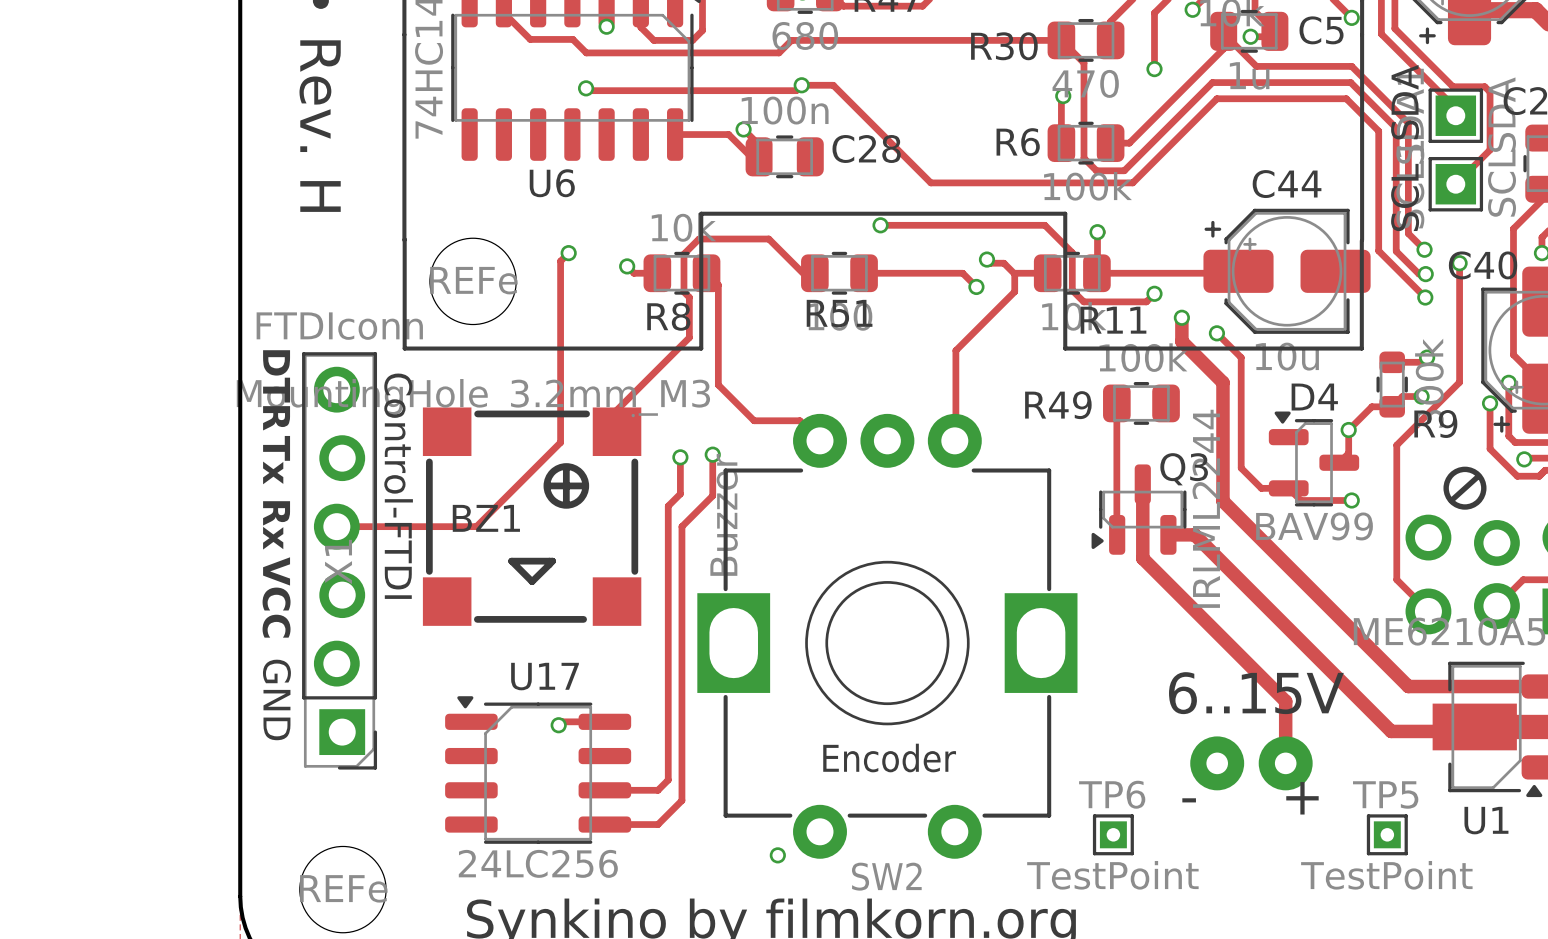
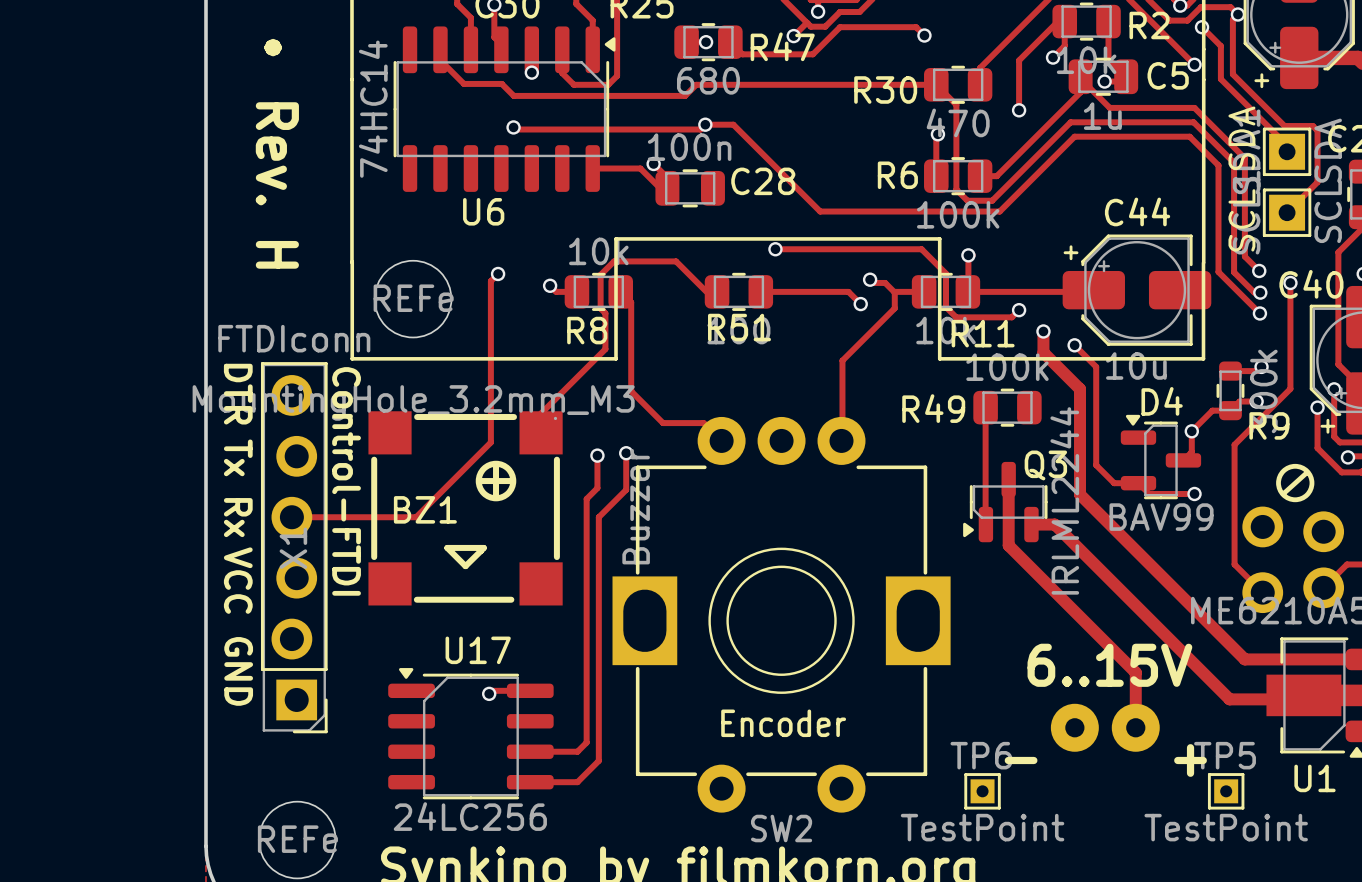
via: (777, 855) -> none

